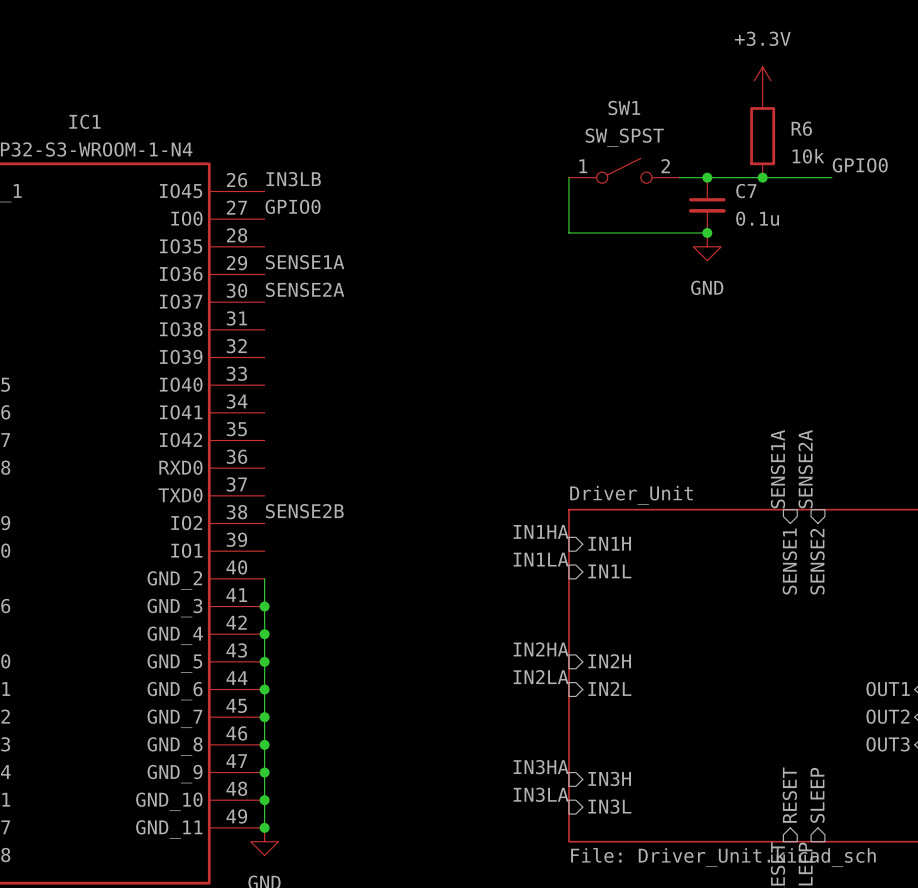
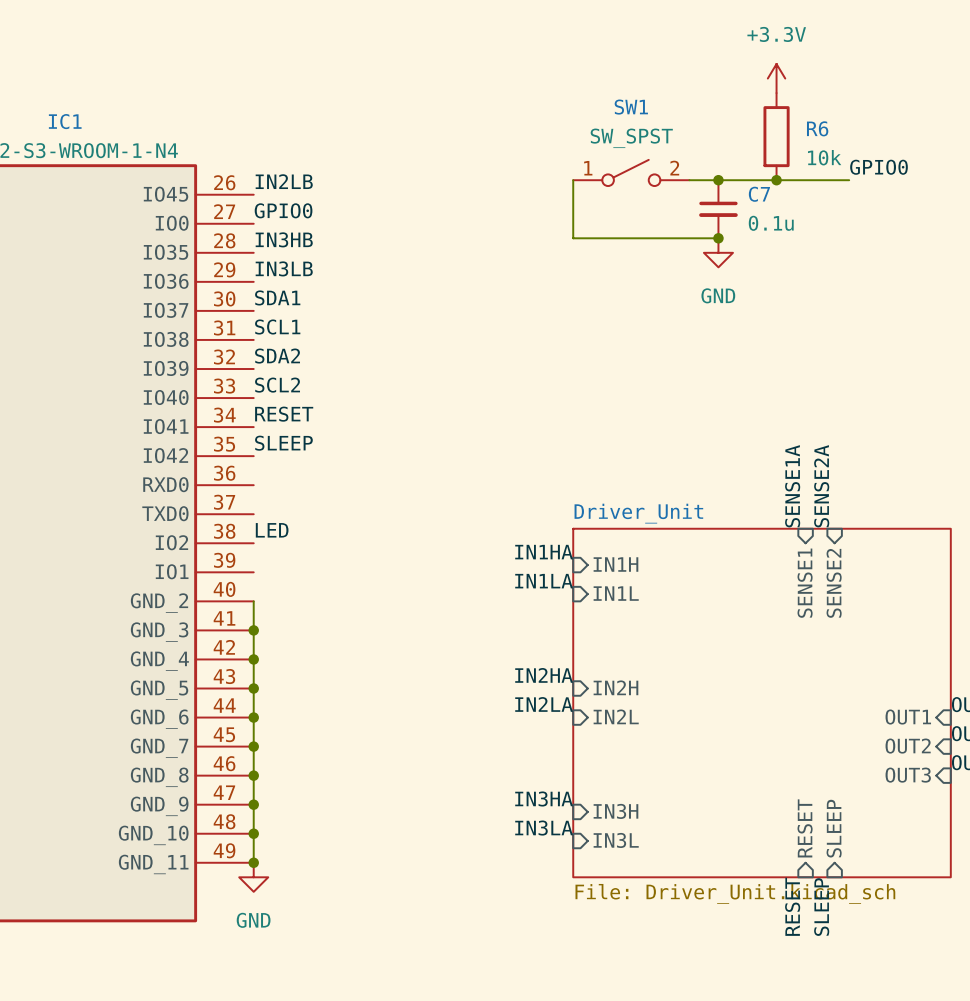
label: IN3LB (293, 179) -> IN2LB (284, 181)
label: none -> IN3HB (284, 239)
label: SENSE1A (305, 262) -> IN3LB (284, 268)
label: SENSE2A (305, 289) -> SDA1 (277, 297)
label: none -> SCL1 (277, 327)
label: none -> SDA2 (277, 356)
label: none -> SCL2 (277, 385)
label: none -> RESET (284, 414)
label: none -> SLEEP (283, 443)
label: SENSE2B (304, 511) -> LED (272, 530)

